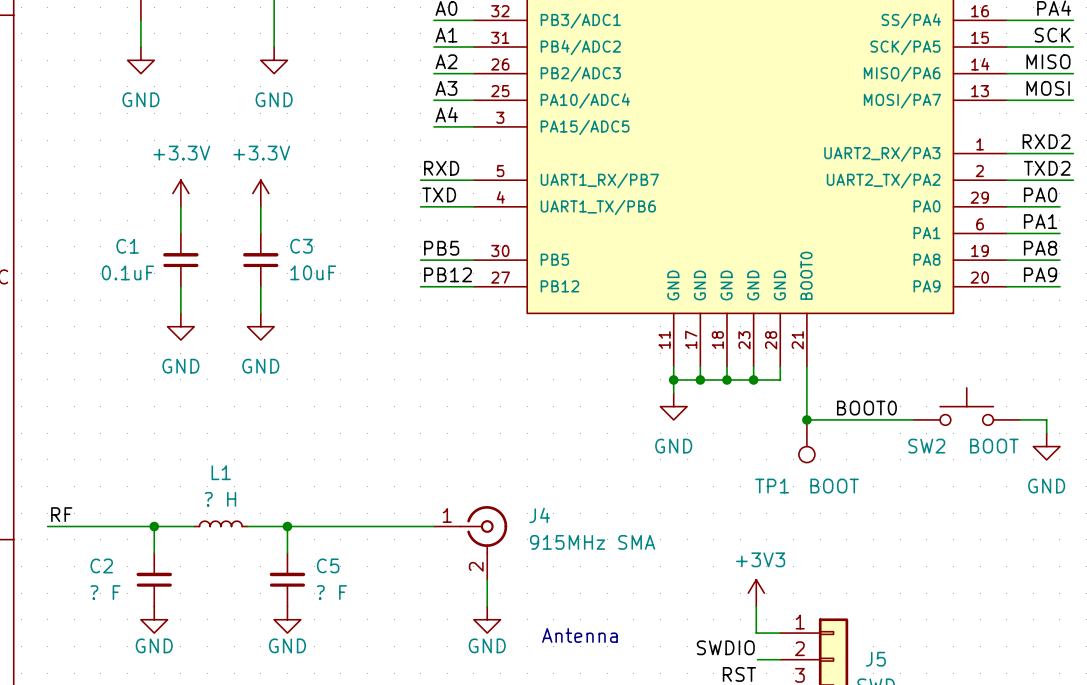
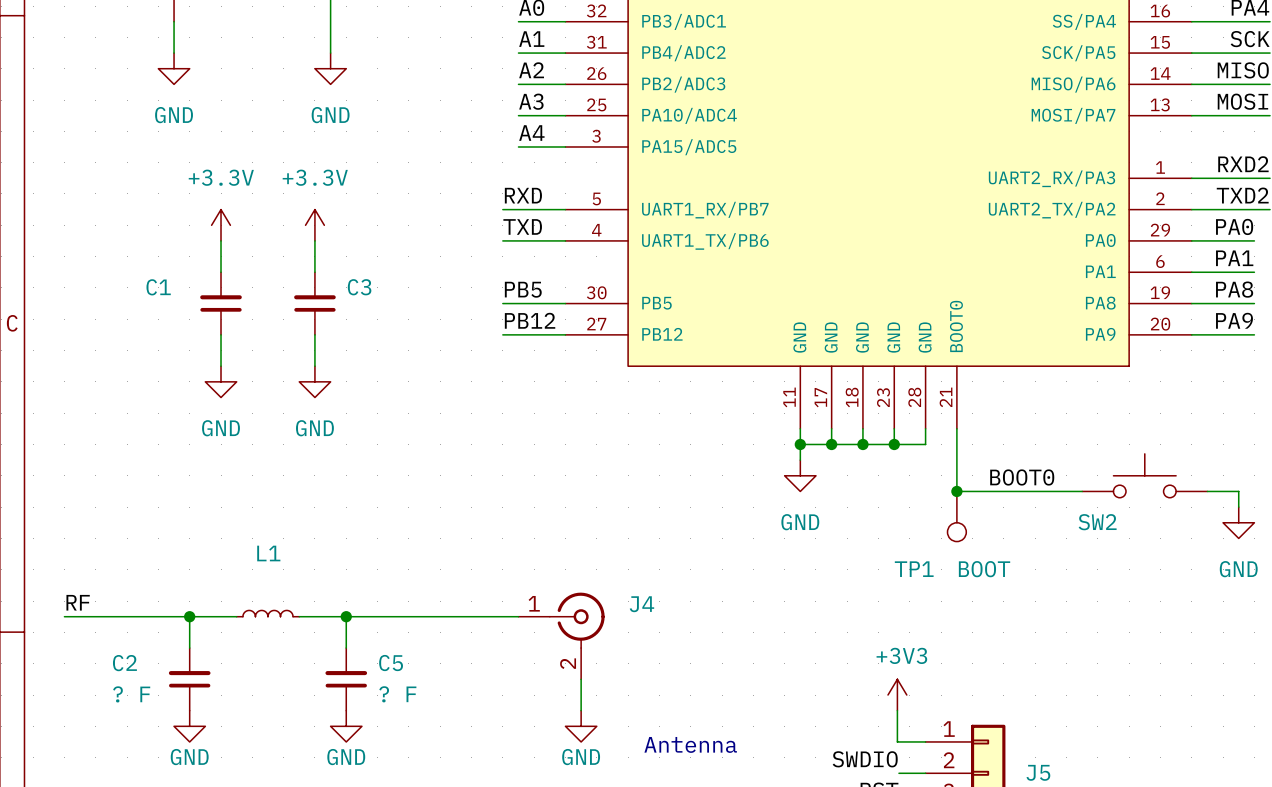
C1 value: 0.1uF (127, 272) -> none
C3 value: 10uF (313, 272) -> none
SW2 value: BOOT (994, 446) -> none
L1 value: ? H (220, 499) -> none
J4 value: 915MHz SMA (592, 542) -> none

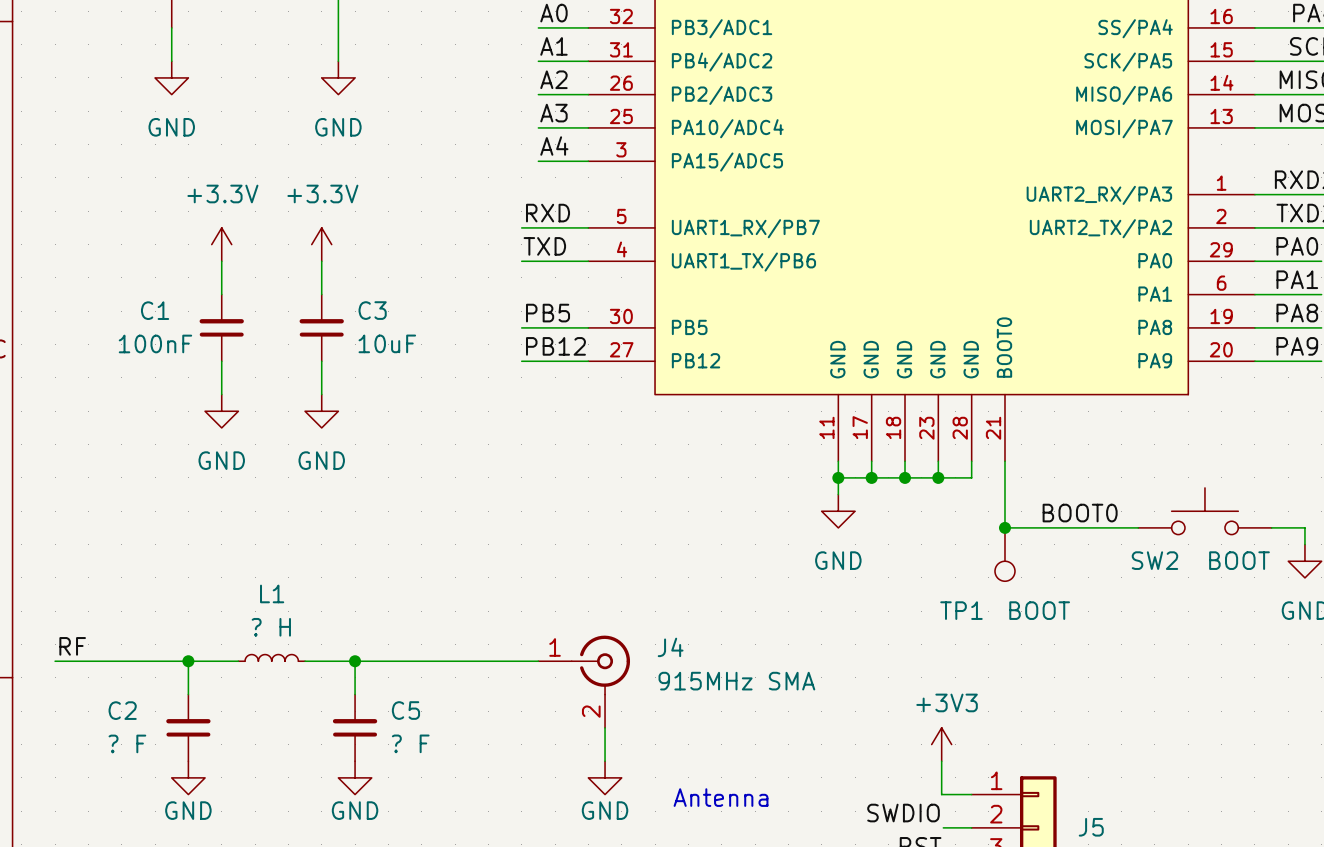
C1 value: none -> 100nF (155, 343)
C3 value: none -> 10uF (387, 343)
SW2 value: none -> BOOT (1239, 560)
L1 value: none -> ? H (271, 627)
J4 value: none -> 915MHz SMA (736, 681)

